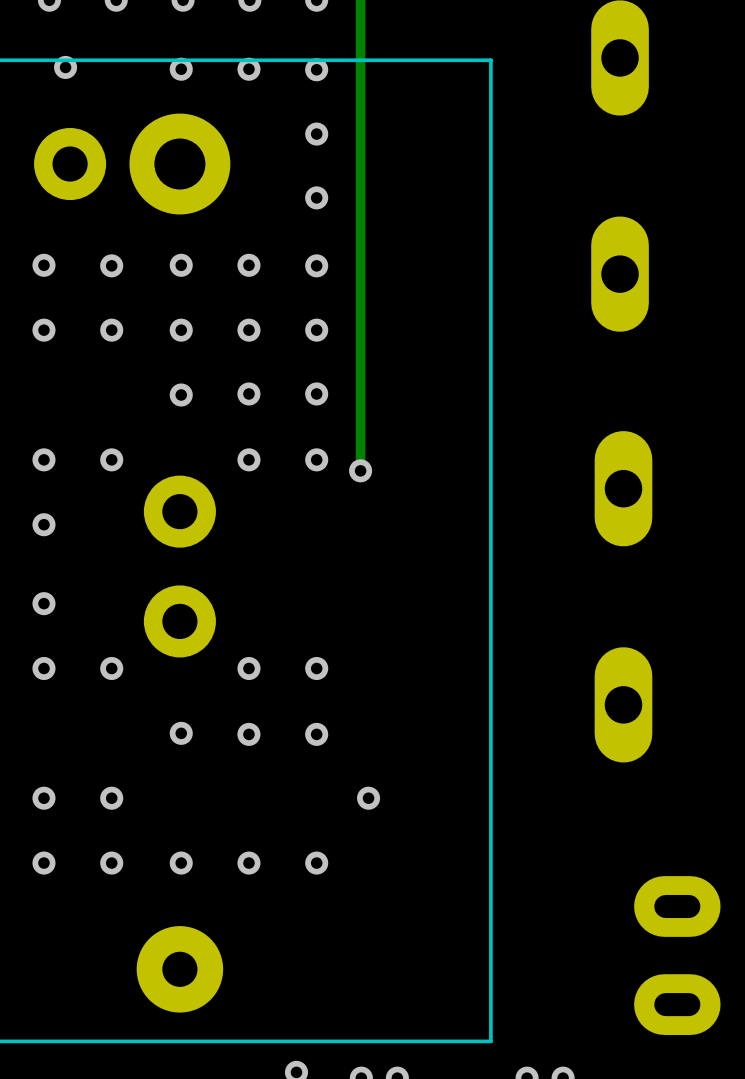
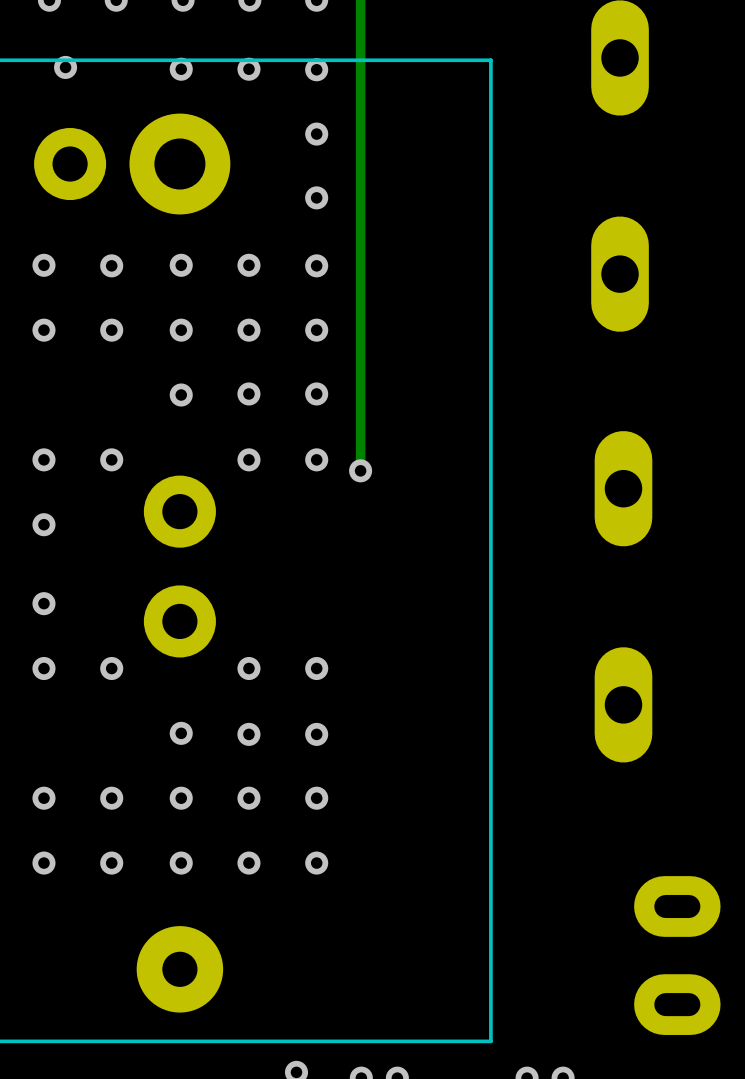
via: none -> (181, 798)
via: none -> (248, 798)
via position: (368, 798) -> (316, 798)

